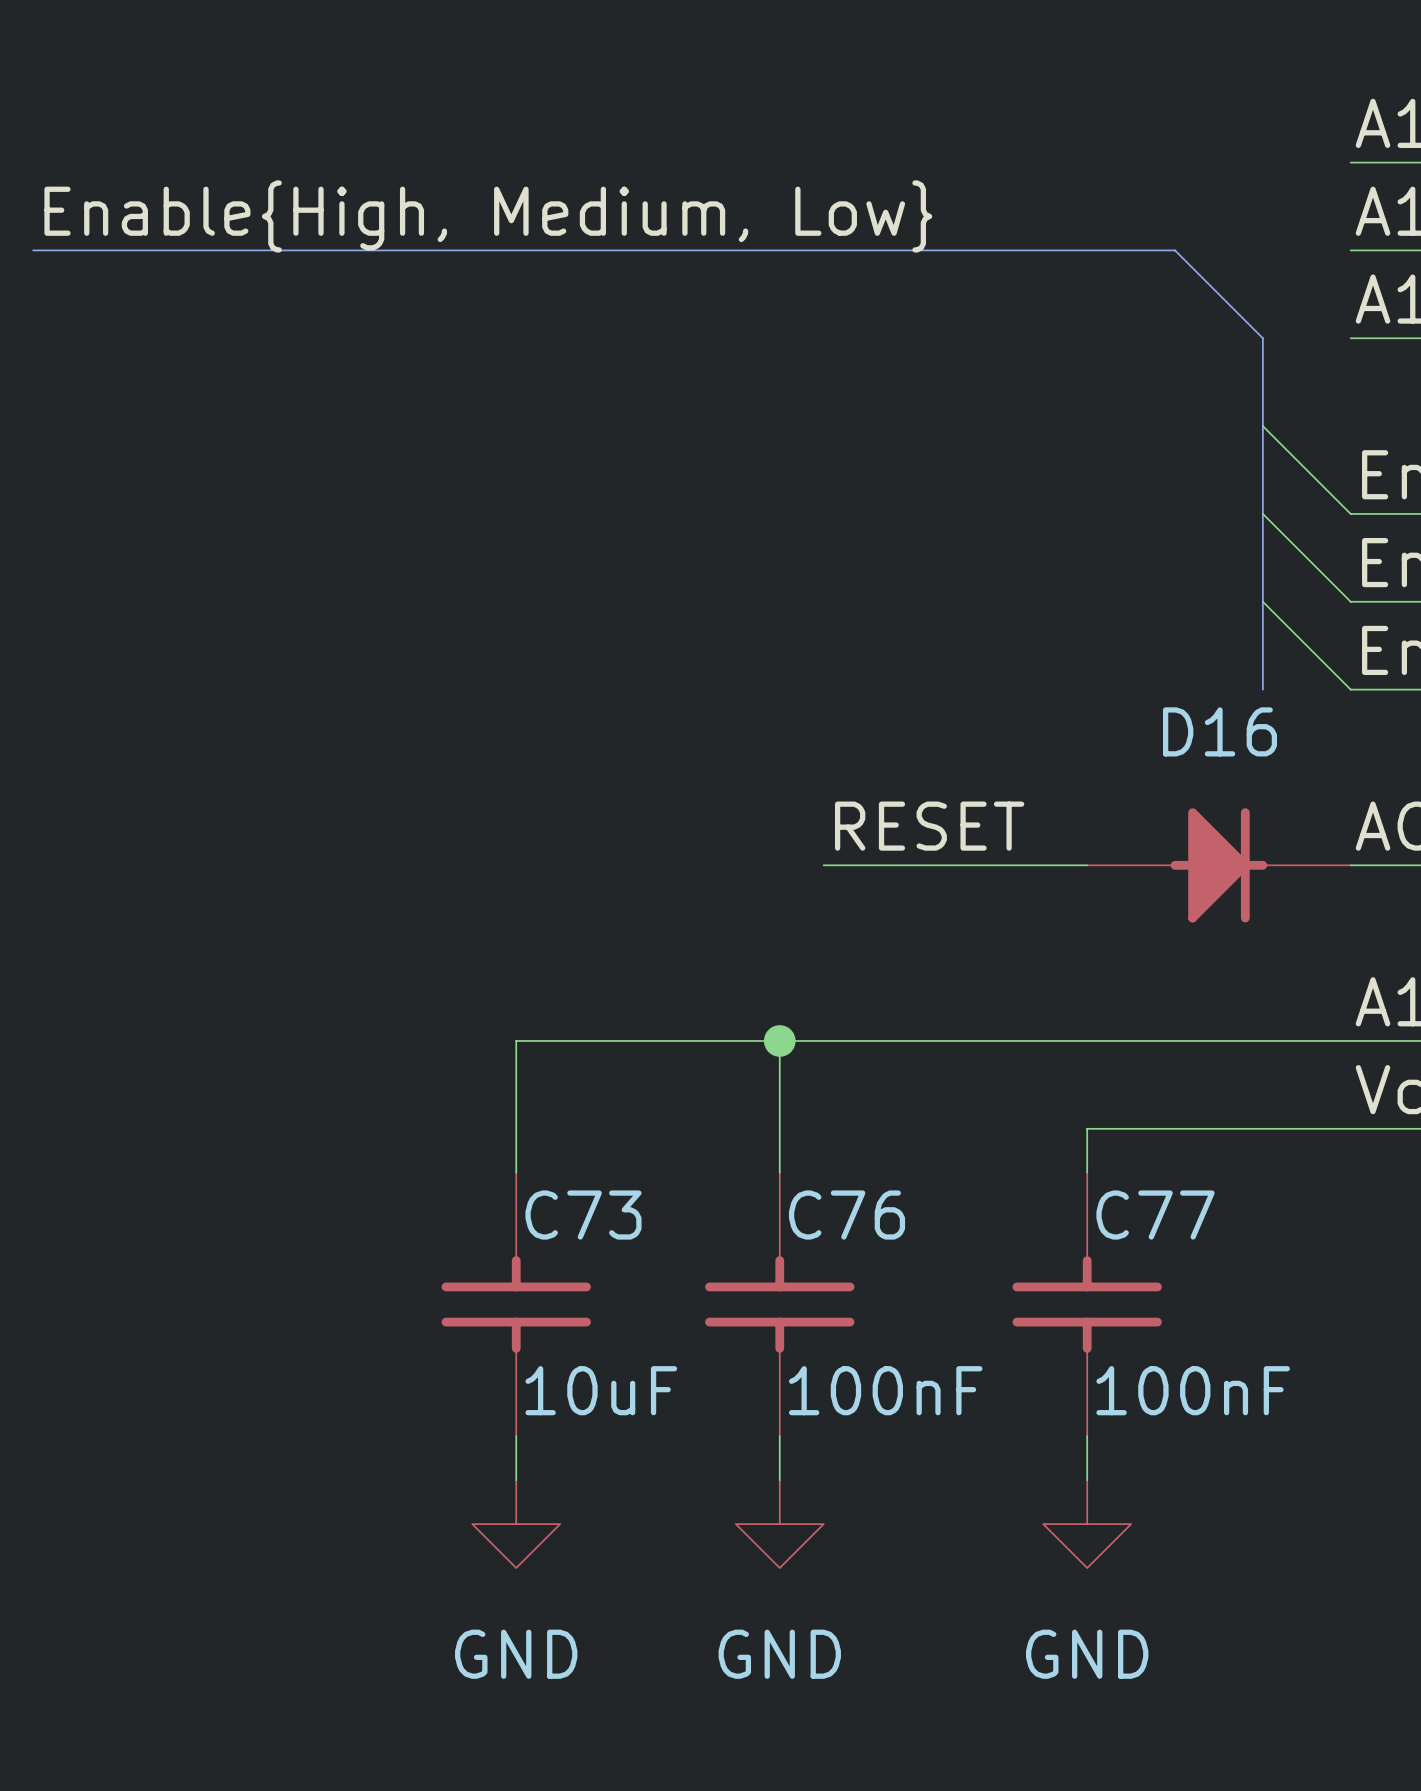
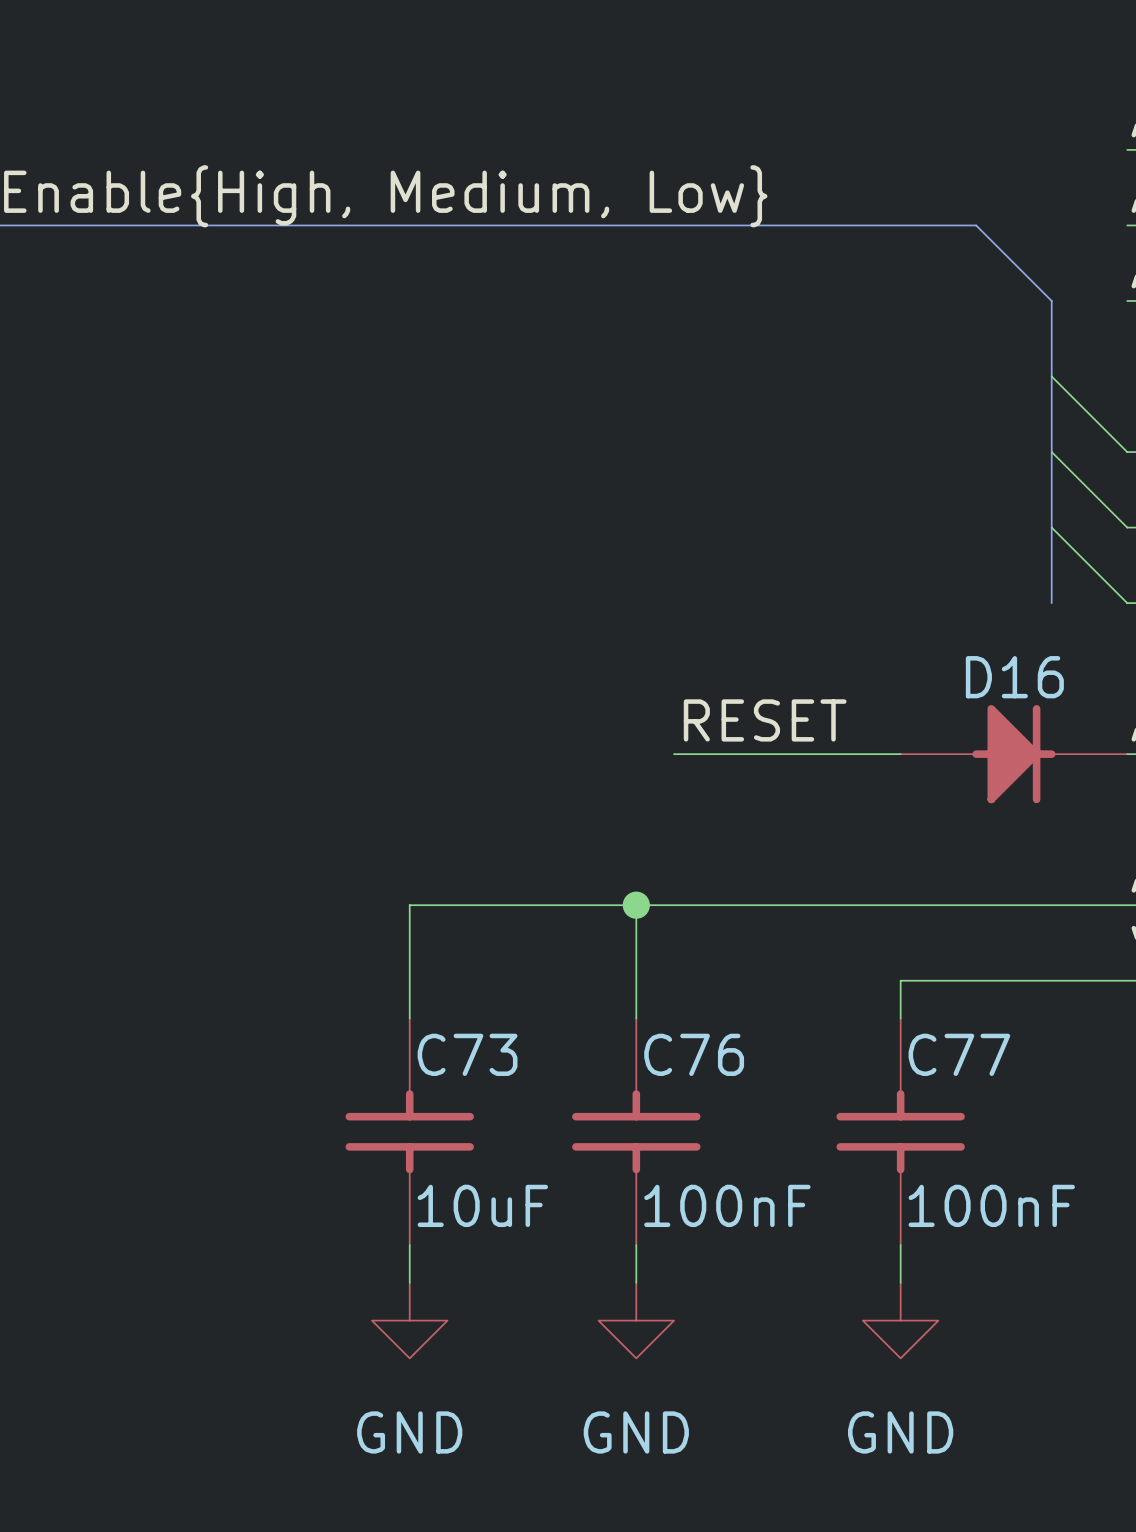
D16 name position: D16 (1220, 731) -> D16 (1014, 677)

